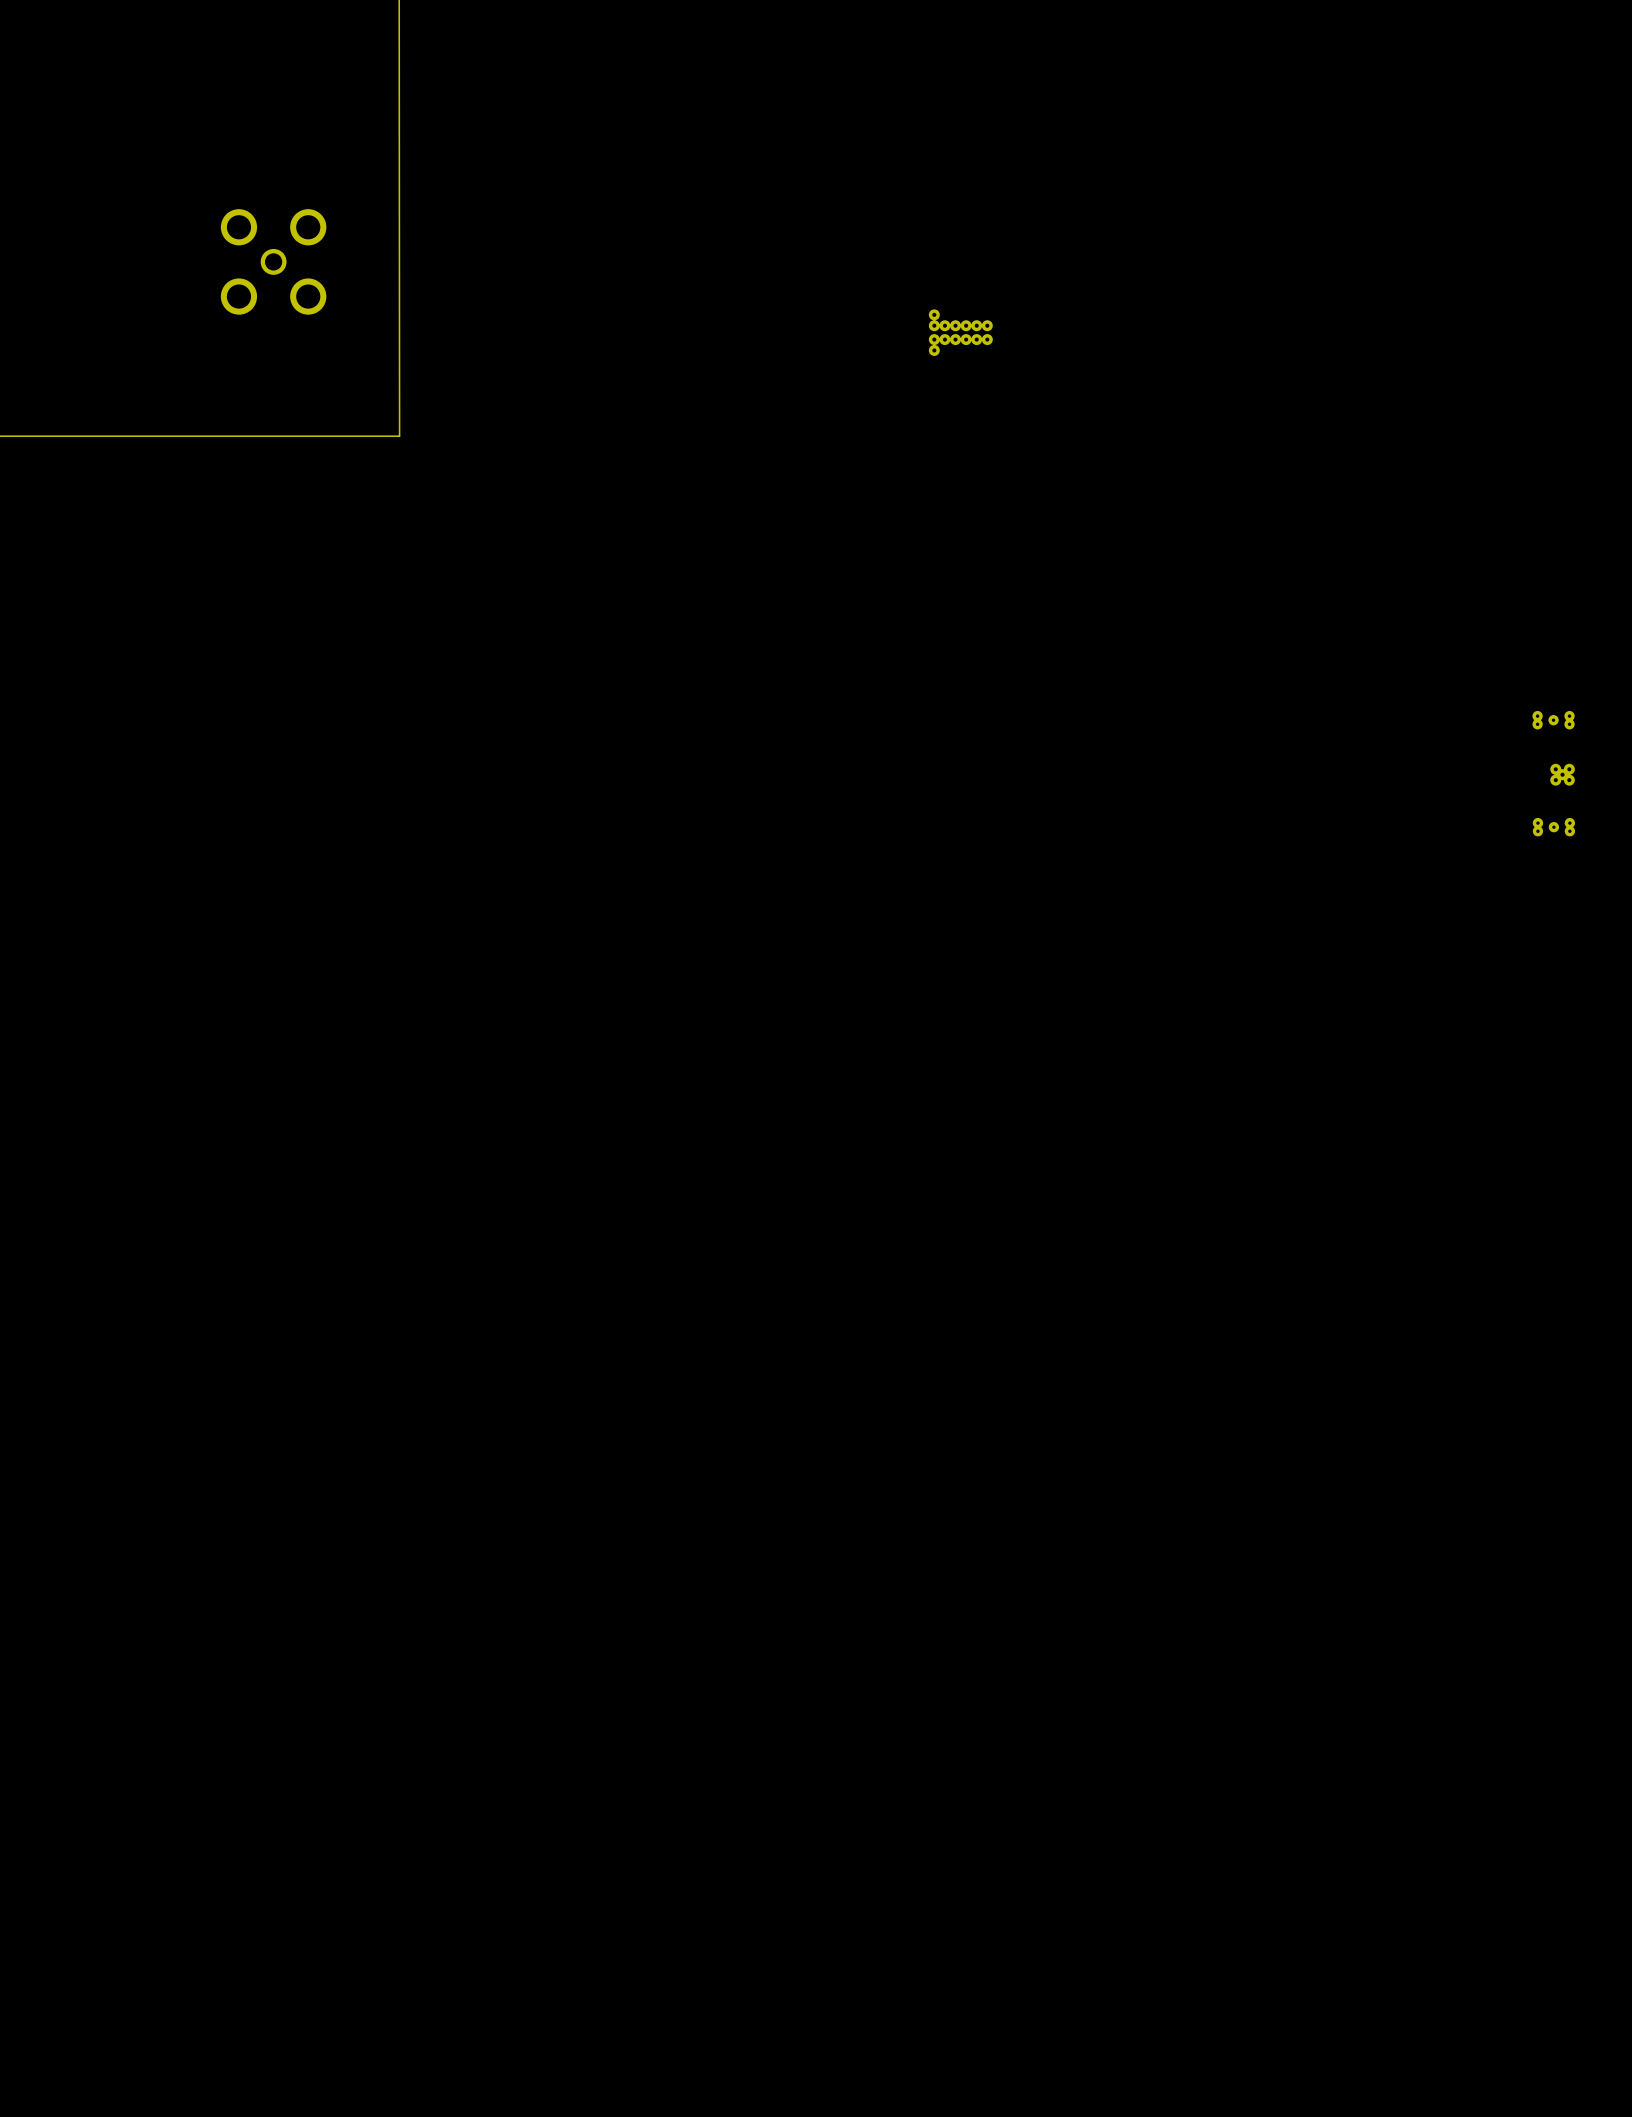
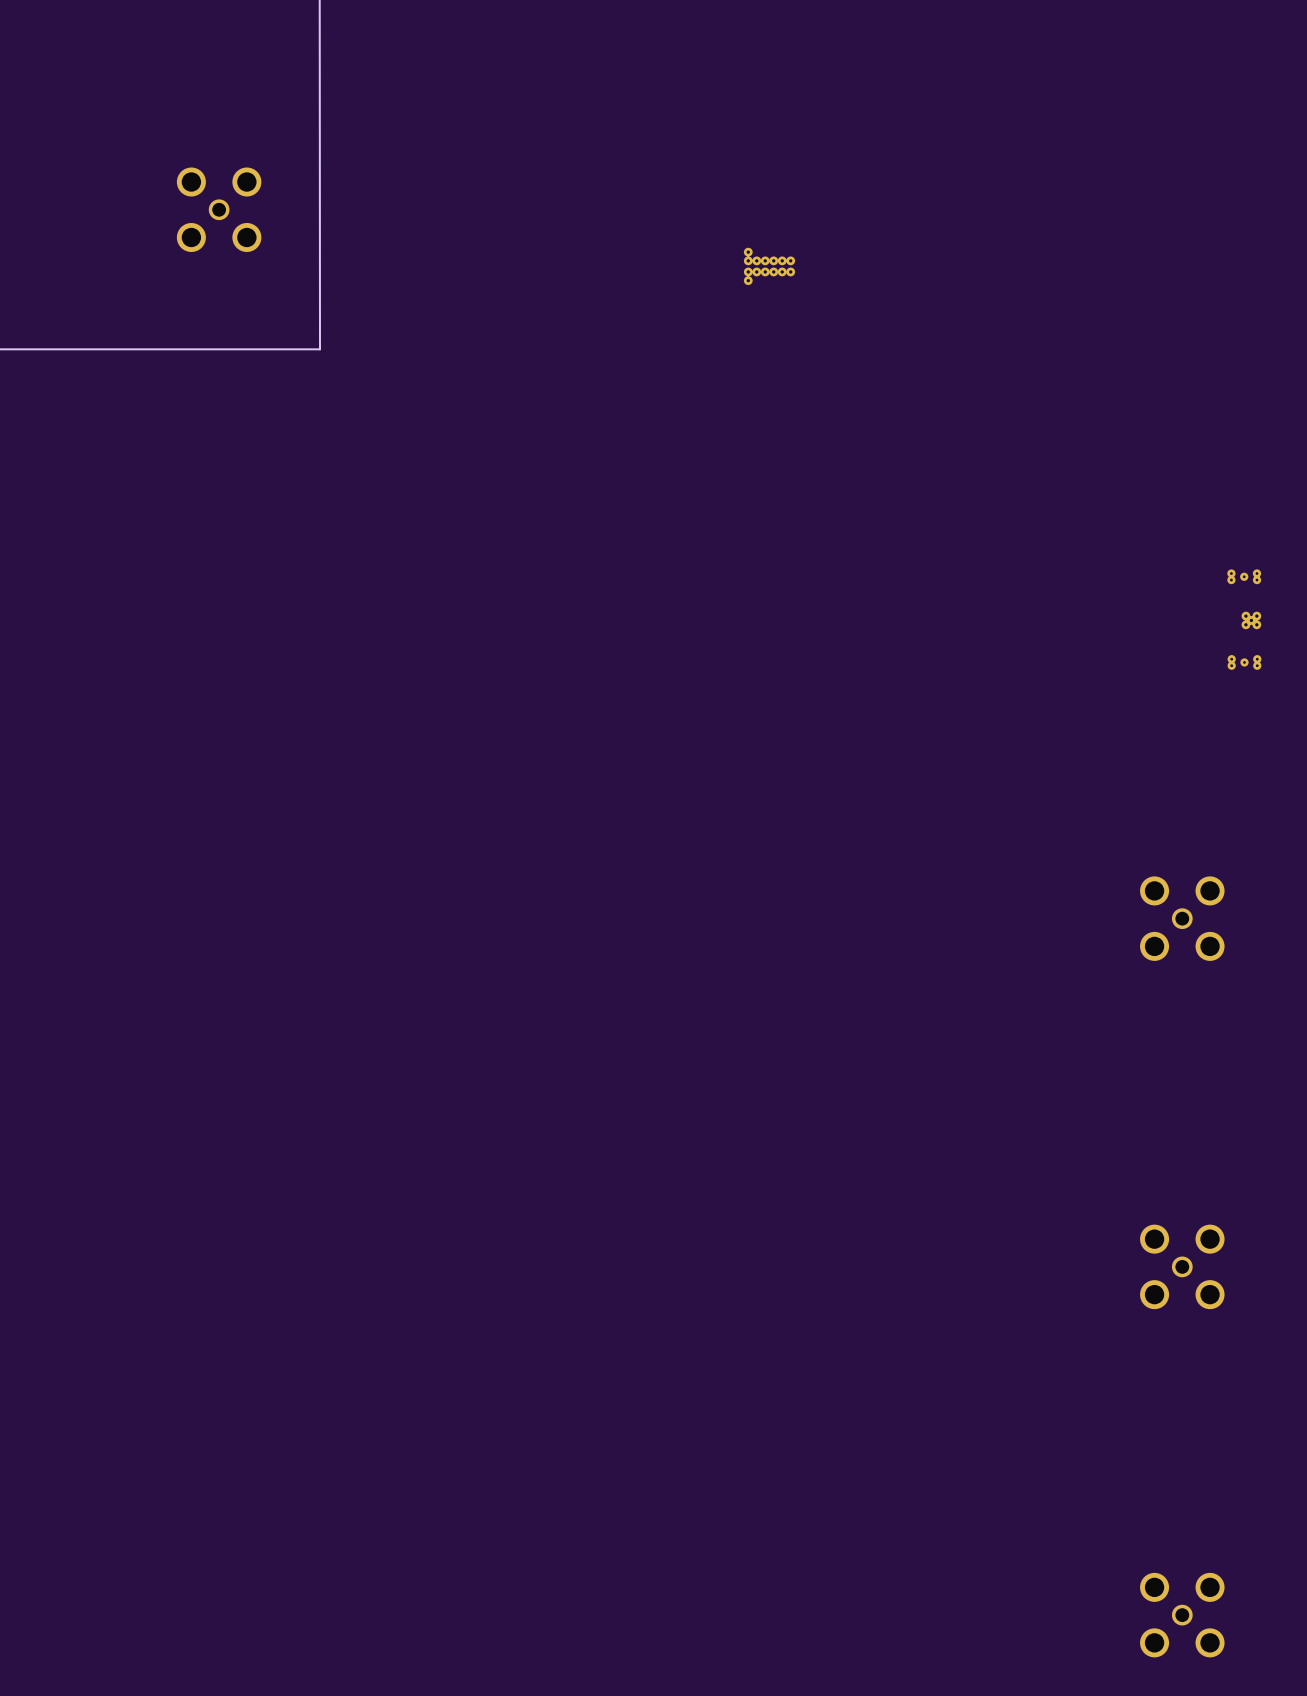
part: none -> (1182, 918)
part: none -> (1182, 1266)
part: none -> (1182, 1615)

